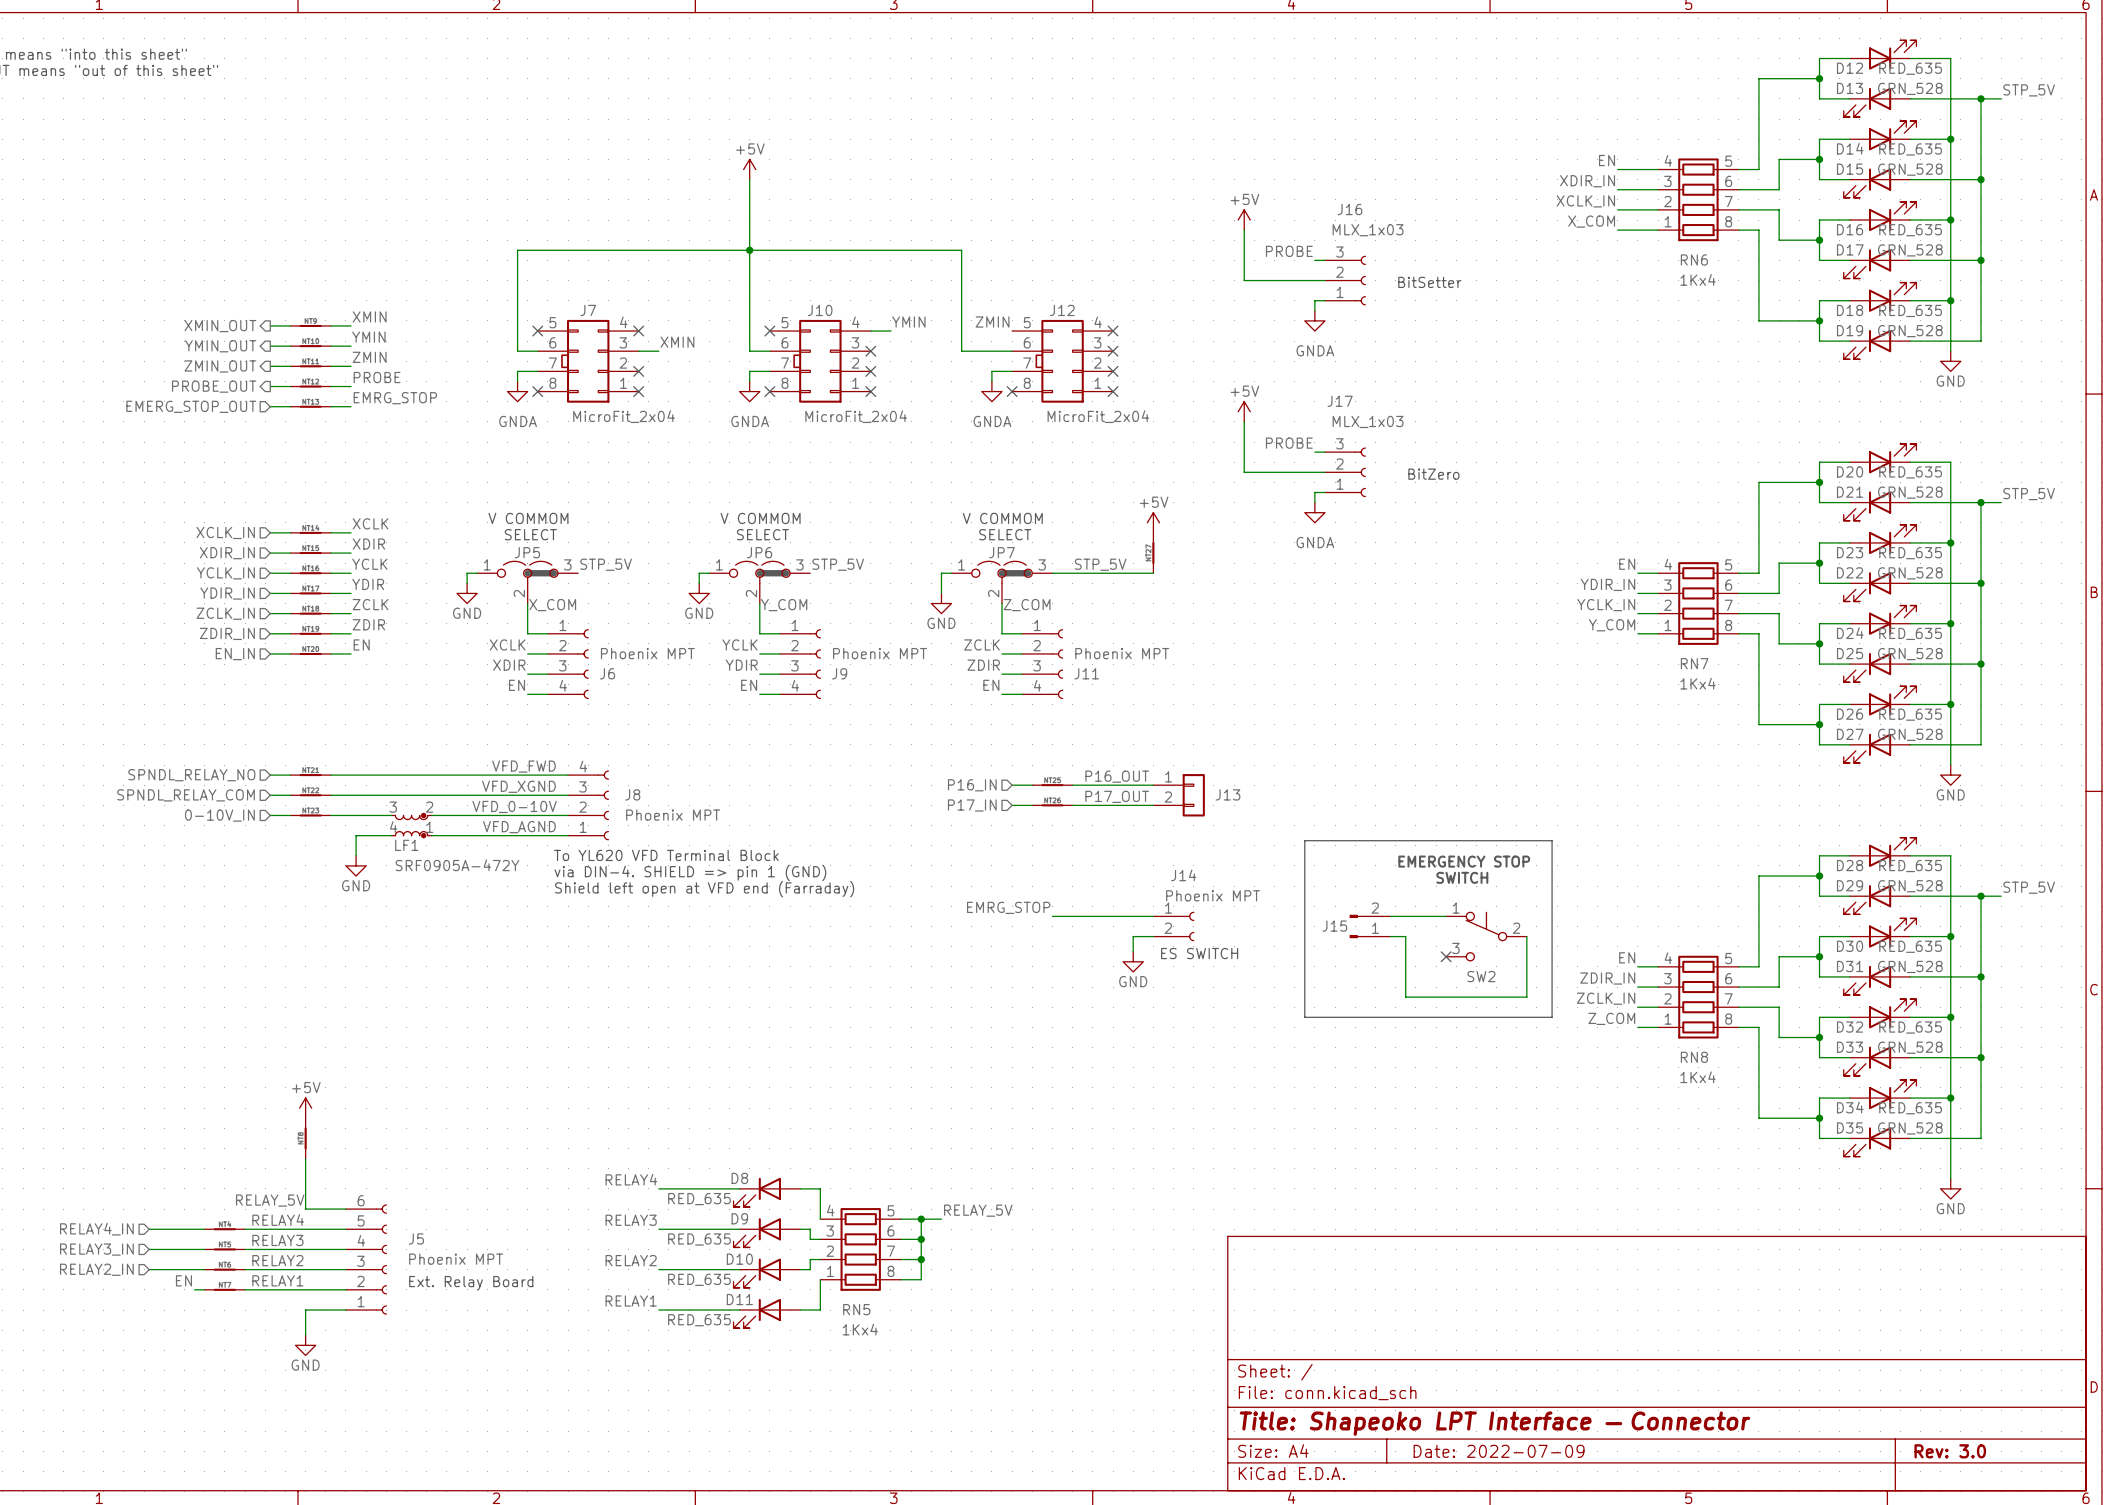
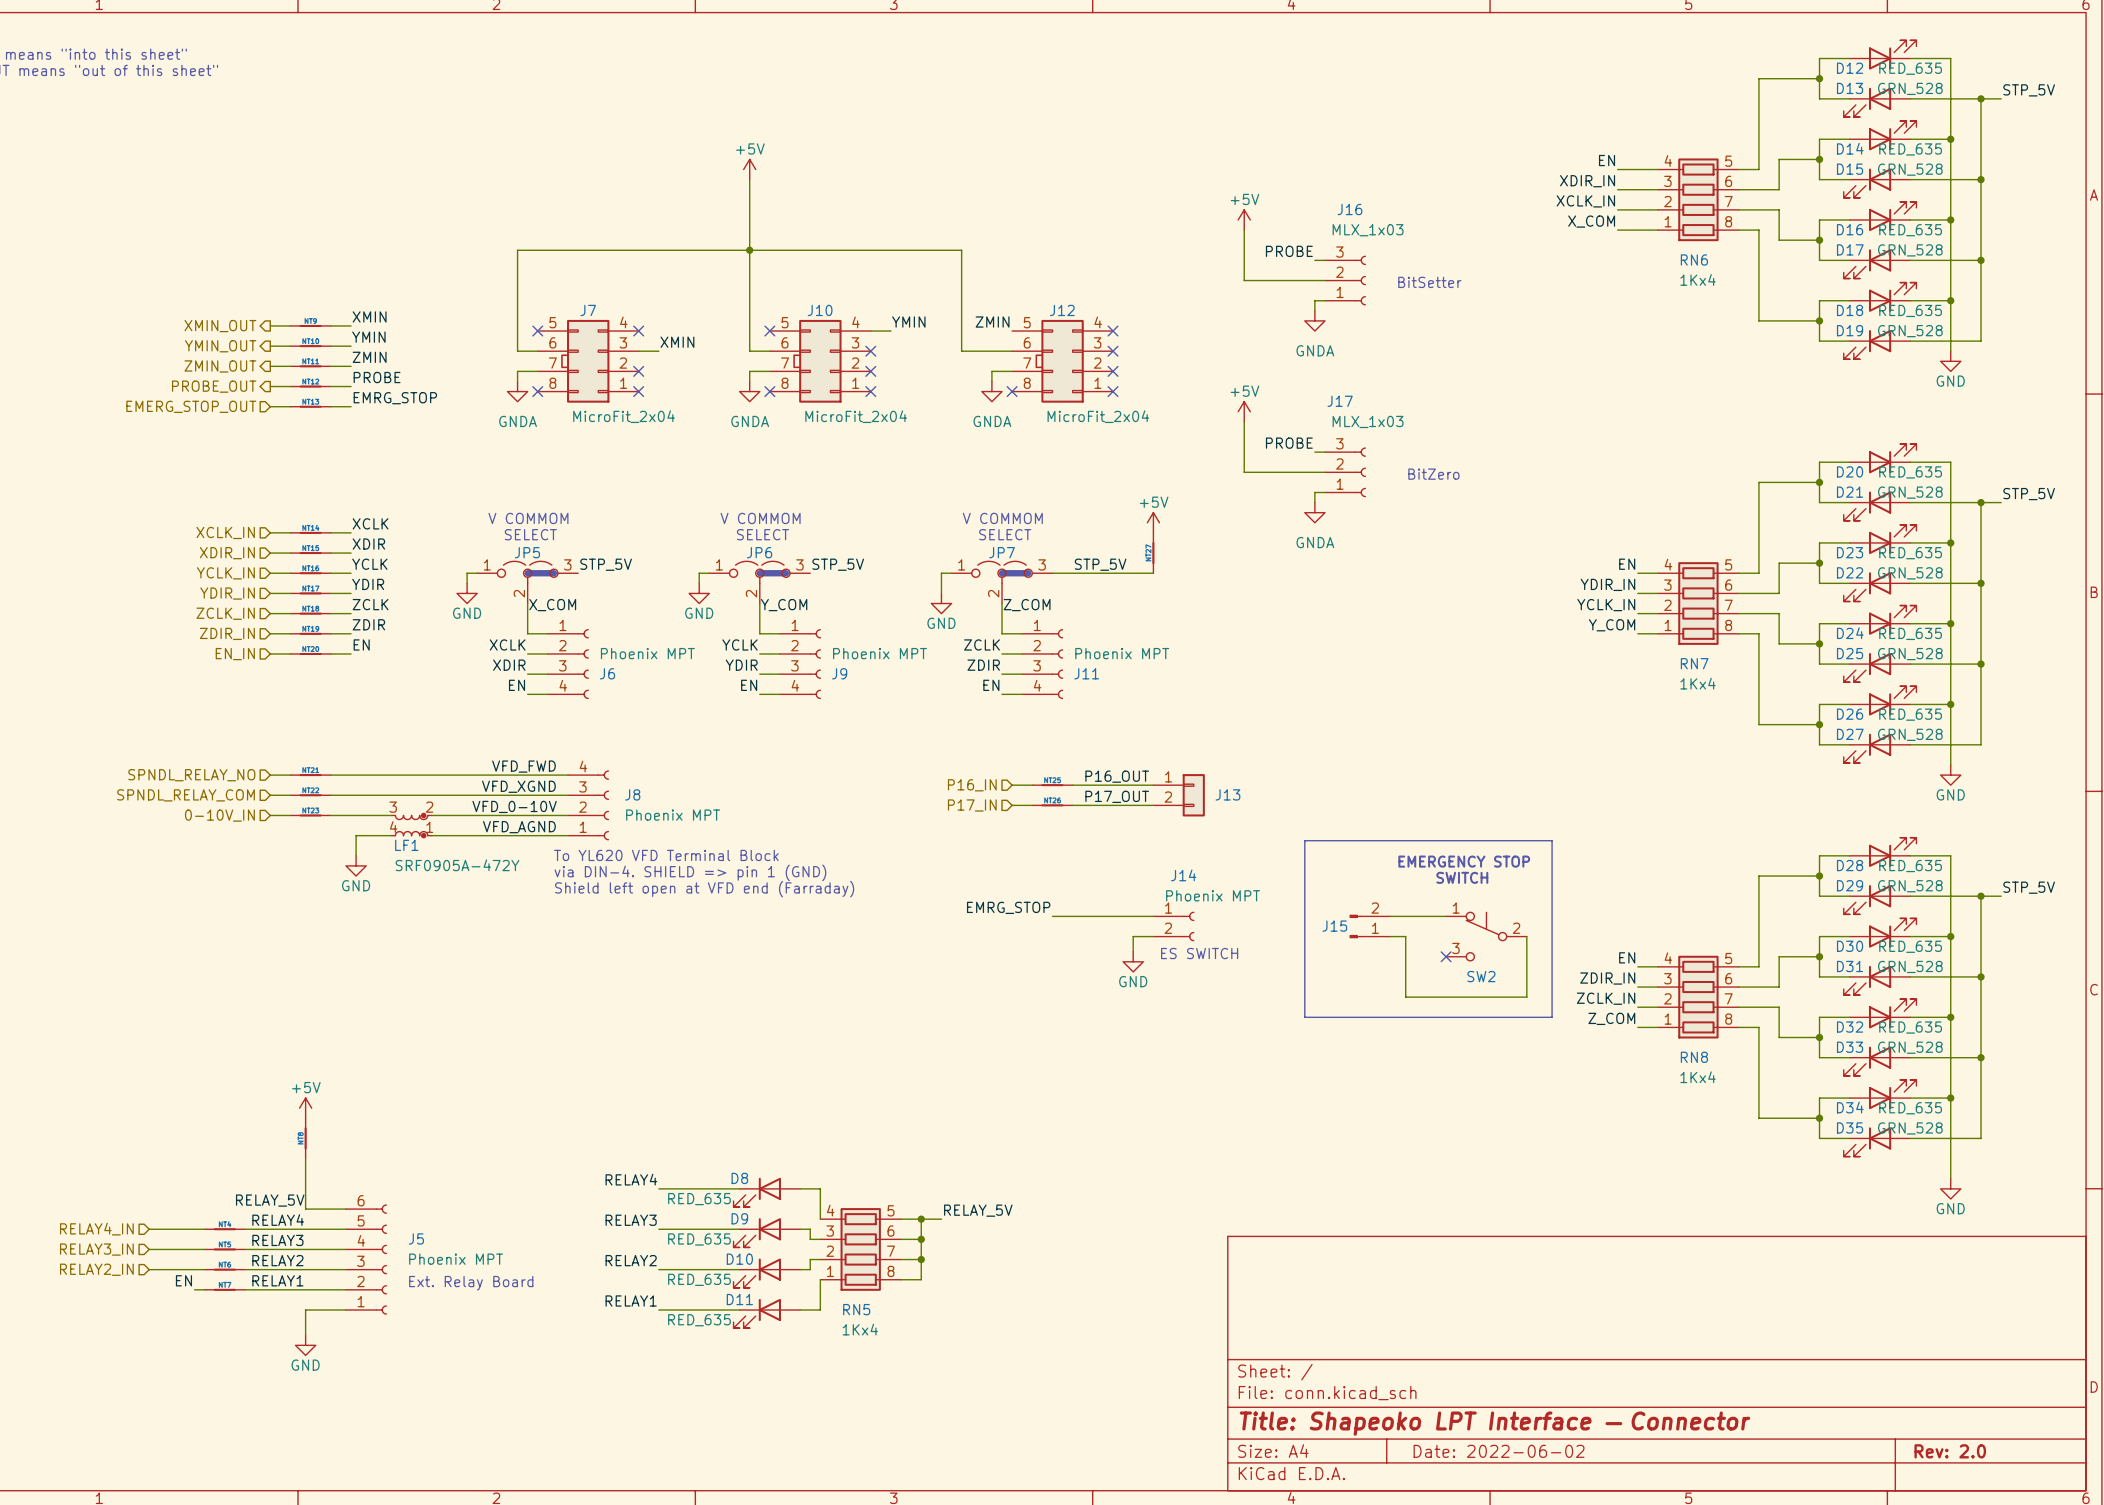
title block: Date: 2022-07-09 (1499, 1451) -> Date: 2022-06-02 (1499, 1451)
title block: Rev: 3.0 (1950, 1451) -> Rev: 2.0 (1950, 1451)

